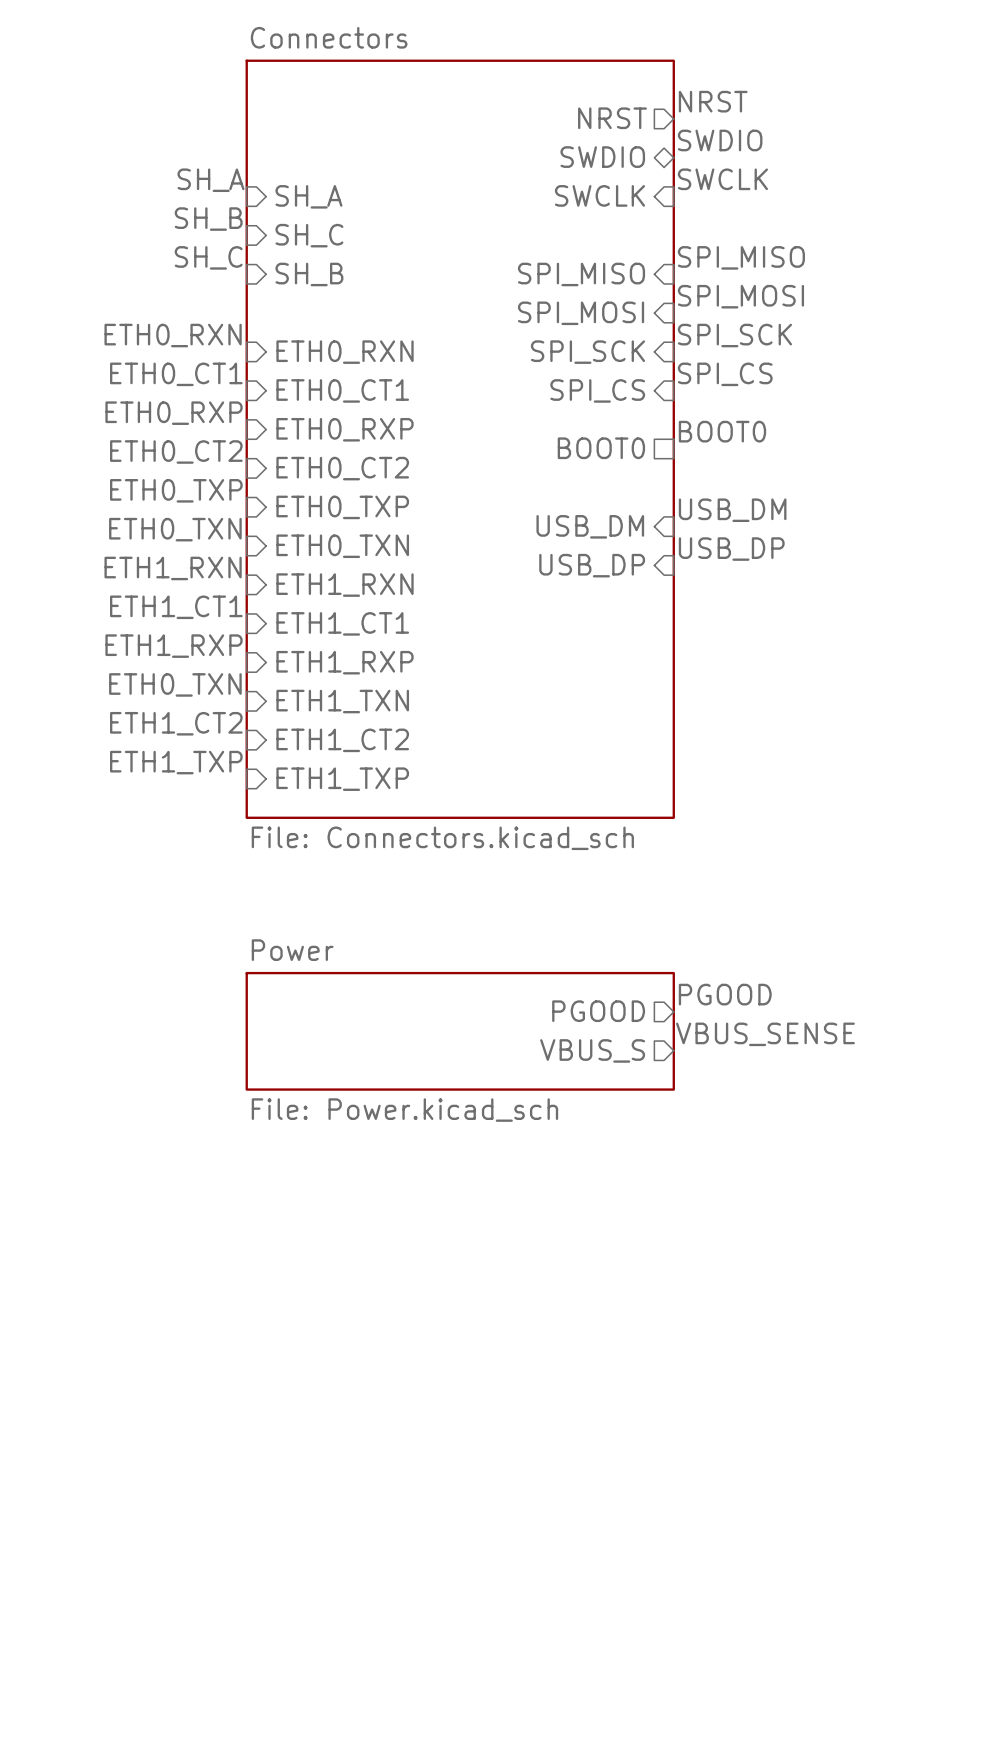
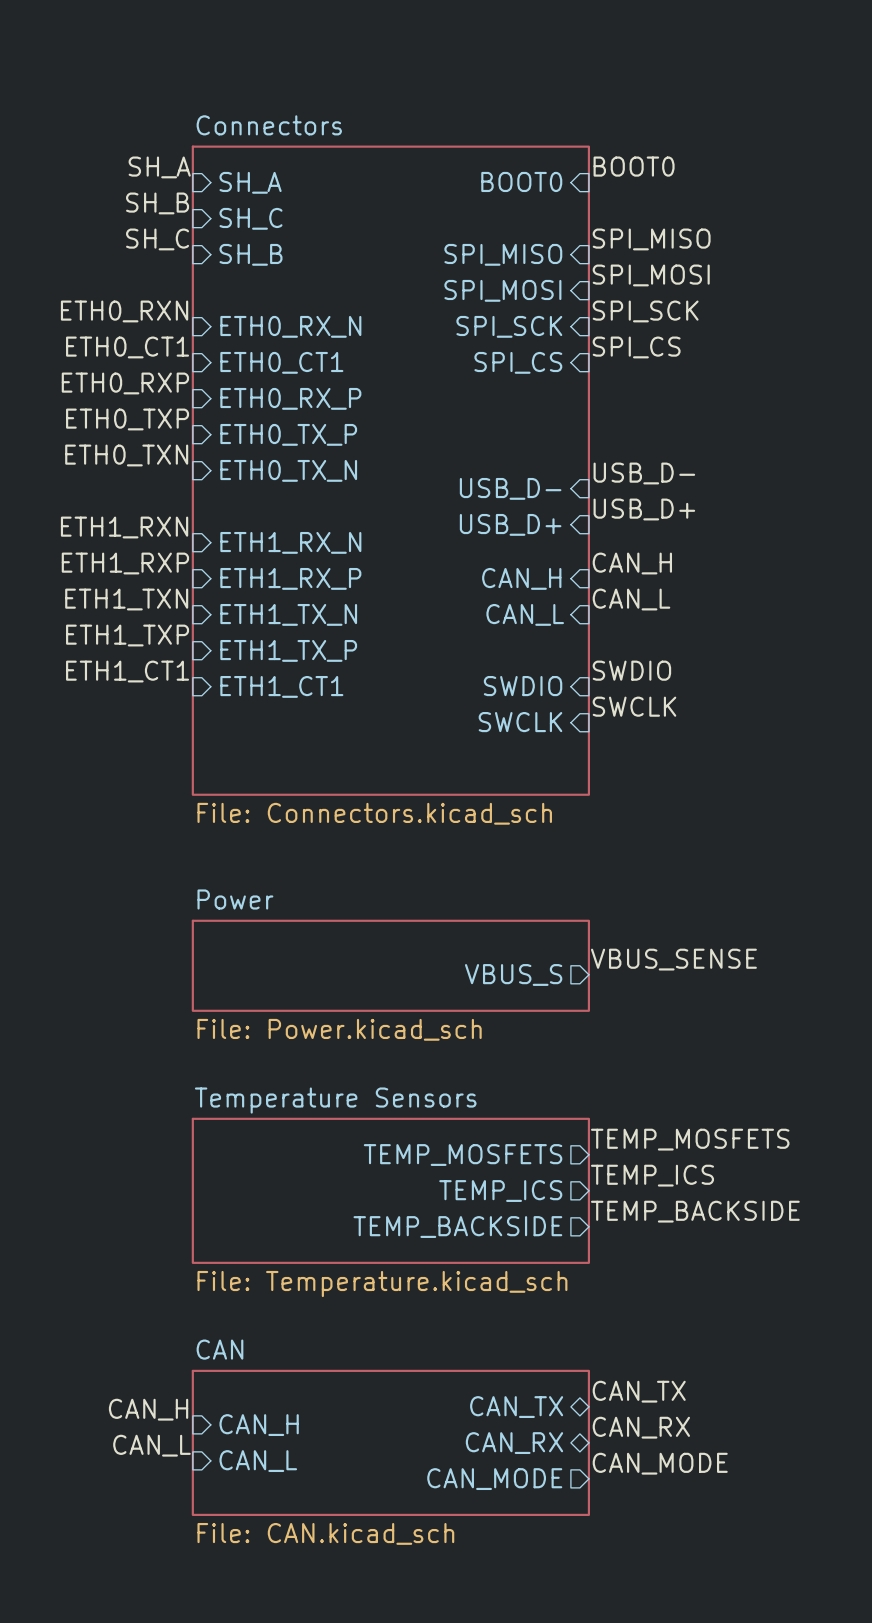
label: NRST (713, 101) -> none
sheet pin: NRST (612, 118) -> none
label: SWDIO (720, 140) -> none
sheet pin: SWDIO (602, 157) -> none
label: SWCLK (722, 179) -> BOOT0 (634, 166)
sheet pin: SWCLK (600, 195) -> BOOT0 (521, 181)
sheet pin: ETH0_RXN (345, 352) -> ETH0_RX_N (290, 326)
sheet pin: ETH0_RXP (345, 429) -> ETH0_RX_P (290, 398)
label: BOOT0 (722, 431) -> none
sheet Connectors: File: Connectors.kicad_sch (460, 439) -> none
sheet pin: BOOT0 (601, 448) -> none
label: ETH0_CT2 (176, 451) -> ETH0_TXP (127, 419)
sheet pin: ETH0_CT2 (342, 468) -> ETH0_TX_P (288, 434)
label: ETH0_TXP (176, 490) -> ETH0_TXN (126, 455)
sheet pin: ETH0_TXP (342, 507) -> ETH0_TX_N (288, 470)
sheet Connectors: none -> File: Connectors.kicad_sch (390, 470)
label: USB_DM (732, 510) -> USB_D- (644, 473)
sheet pin: USB_DM (590, 526) -> USB_D- (510, 488)
label: ETH0_TXN (175, 529) -> none
sheet pin: ETH0_TXN (342, 546) -> none
label: USB_DP (731, 549) -> USB_D+ (644, 509)
sheet pin: USB_DP (592, 565) -> USB_D+ (510, 524)
sheet pin: ETH1_RXN (345, 585) -> ETH1_RX_N (290, 542)
label: ETH1_CT1 (176, 607) -> ETH1_RXP (125, 563)
label: none -> CAN_H (632, 563)
sheet pin: ETH1_CT1 (342, 623) -> ETH1_RX_P (290, 578)
sheet pin: none -> CAN_H (521, 578)
label: ETH1_RXP (174, 646) -> ETH1_TXN (126, 599)
label: none -> CAN_L (631, 599)
sheet pin: ETH1_RXP (345, 662) -> ETH1_TX_N (288, 614)
sheet pin: none -> CAN_L (525, 614)
label: ETH0_TXN (175, 684) -> ETH1_TXP (127, 635)
sheet pin: ETH1_TXN (342, 701) -> ETH1_TX_P (288, 650)
label: none -> SWDIO (631, 670)
label: ETH1_CT2 (176, 723) -> ETH1_CT1 (127, 671)
sheet pin: none -> SWDIO (523, 686)
sheet pin: ETH1_CT2 (342, 740) -> ETH1_CT1 (281, 686)
label: none -> SWCLK (634, 706)
label: ETH1_TXP (176, 762) -> none
sheet pin: none -> SWCLK (520, 722)
sheet pin: ETH1_TXP (342, 779) -> none
sheet Power shape: [245, 971, 675, 1091] -> [191, 919, 591, 1012]
label: PGOOD (725, 994) -> none
sheet pin: PGOOD (598, 1011) -> none
label: none -> TEMP_MOSFETS (690, 1139)
sheet pin: none -> TEMP_MOSFETS (463, 1155)
label: none -> TEMP_ICS (652, 1175)
sheet Temperature Sensors: none -> File: Temperature.kicad_sch (390, 1190)
sheet pin: none -> TEMP_ICS (500, 1191)
label: none -> TEMP_BACKSIDE (695, 1211)
sheet pin: none -> TEMP_BACKSIDE (457, 1227)
label: none -> CAN_TX (639, 1391)
sheet pin: none -> CAN_TX (516, 1407)
label: none -> CAN_H (148, 1409)
sheet pin: none -> CAN_H (259, 1425)
label: none -> CAN_RX (641, 1427)
sheet CAN: none -> File: CAN.kicad_sch (390, 1442)
sheet pin: none -> CAN_RX (514, 1443)
label: none -> CAN_L (151, 1445)
sheet pin: none -> CAN_L (258, 1461)
label: none -> CAN_MODE (660, 1463)
sheet pin: none -> CAN_MODE (494, 1479)

